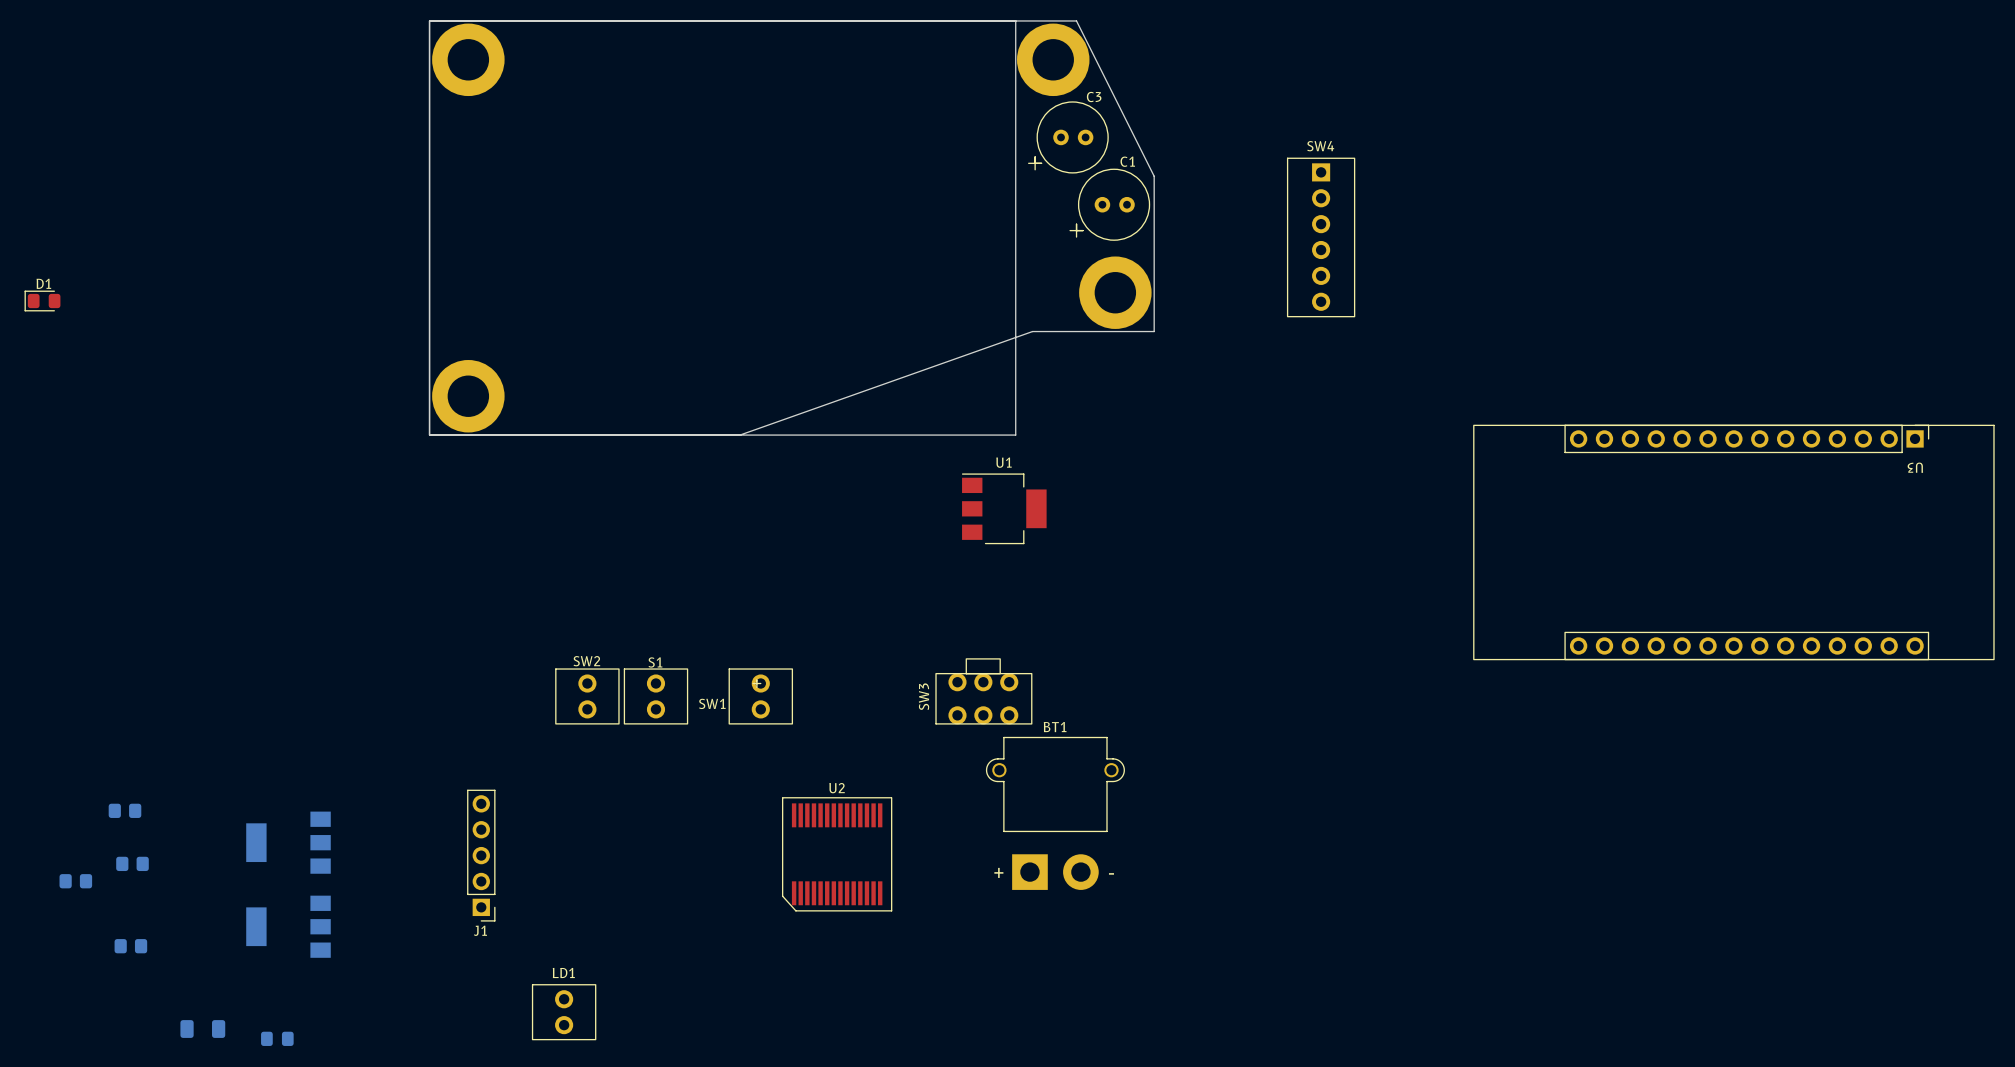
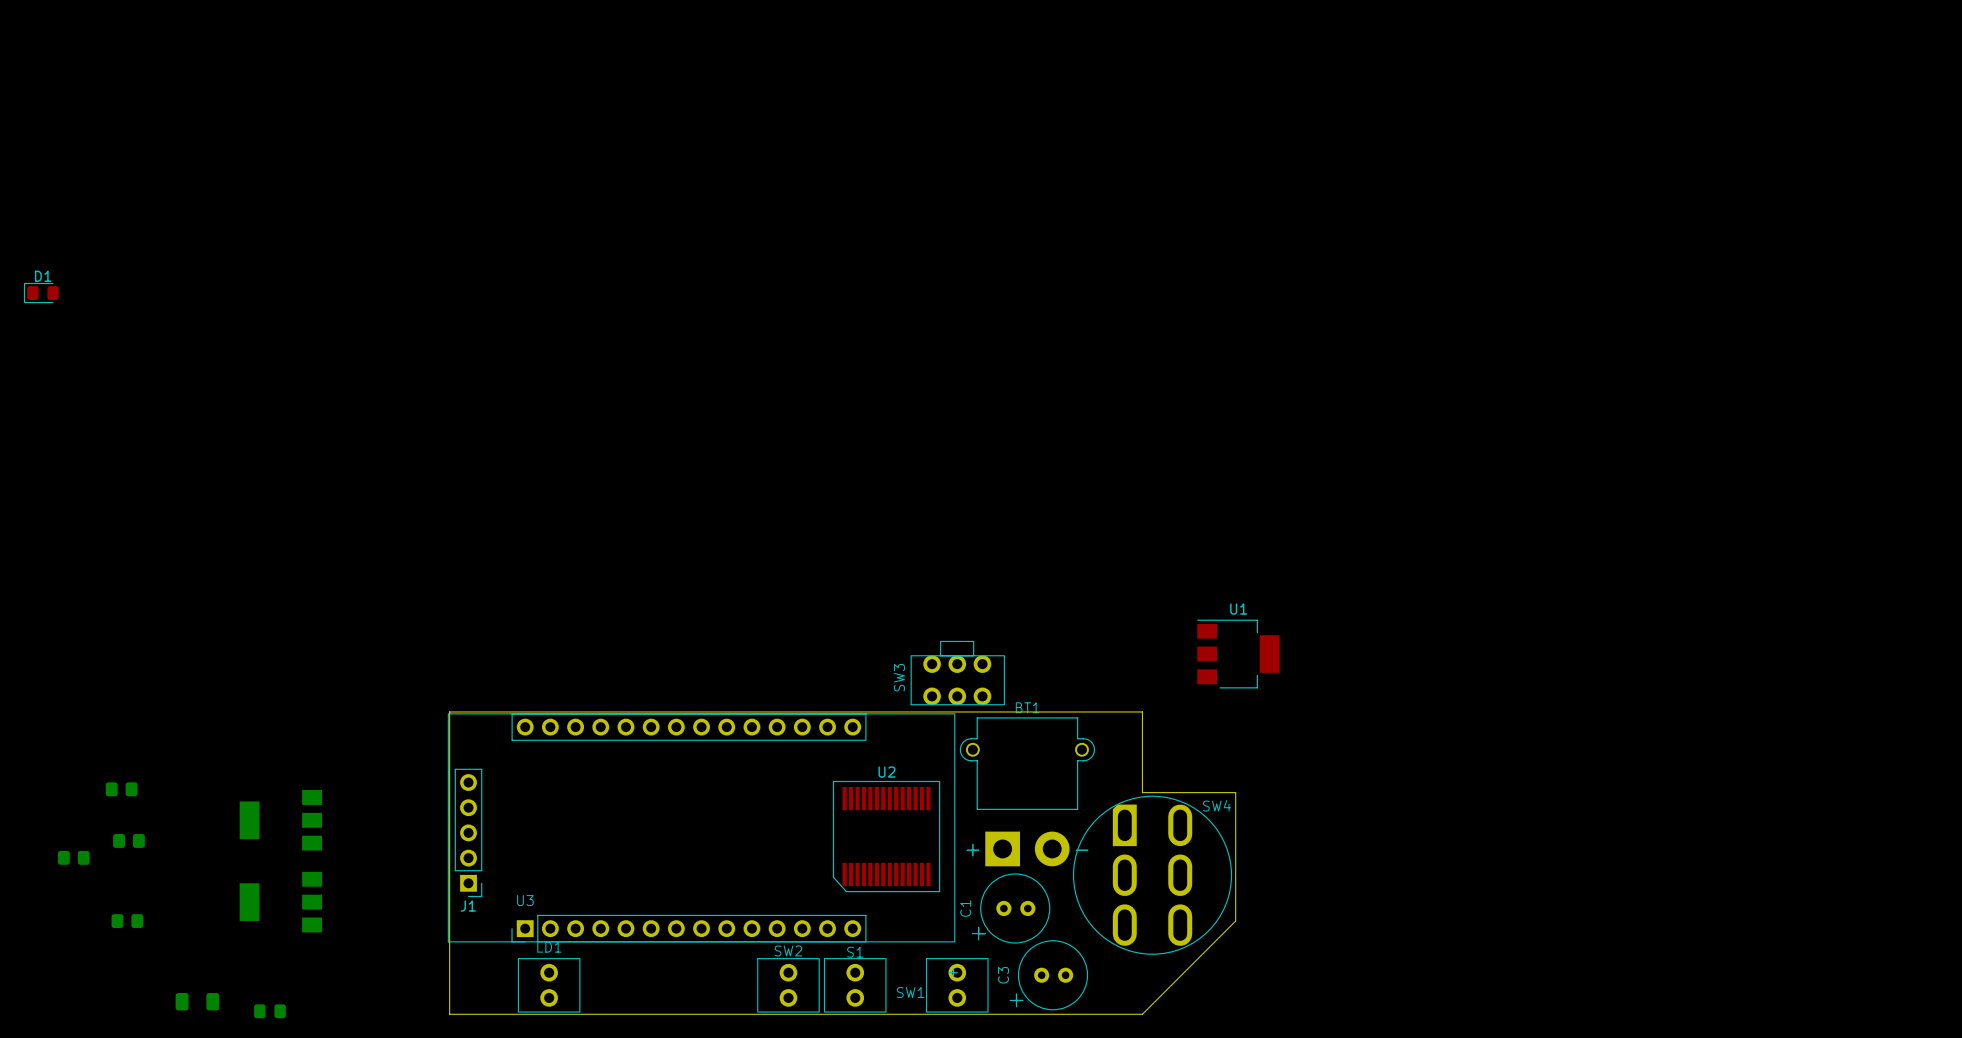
board edge: (1015, 20) (1015, 435) (429, 435) (429, 20) (1076, 20) (1154, 176) (1154, 331) (1032, 331) (740, 435) -> none
part: (468, 59) -> none
part: (1053, 59) -> none
C3 name rotation: 0° (1094, 97) -> 90° counterclockwise (1003, 975)
C3 name position: C3 (1094, 97) -> C3 (1003, 975)
C3 position: (1068, 137) -> (1048, 975)
SW4 name position: SW4 (1320, 146) -> SW4 (1217, 805)
SW4 footprint: [1287, 157, 1356, 318] -> [1073, 795, 1233, 955]
C1 name rotation: 0° (1127, 161) -> 90° counterclockwise (965, 908)
C1 name position: C1 (1127, 161) -> C1 (965, 908)
C1 position: (1109, 204) -> (1011, 908)
part: (1115, 292) -> none
part: (468, 396) -> none
U1 position: (1004, 508) -> (1238, 654)
U3 rotation: 0° (1733, 542) -> 180° (701, 827)
U3 position: (1733, 542) -> (701, 827)
line: (756, 679) (756, 687) -> none
line: (753, 683) (760, 683) -> none
SW2 position: (587, 696) -> (788, 985)
S1 position: (655, 696) -> (855, 985)
SW1 position: (760, 696) -> (957, 985)
board edge: none -> (449, 711) (449, 1014) (1142, 1014) (1235, 921) (1235, 792) (1142, 792) (1142, 711) (449, 711)
U2 position: (837, 854) -> (886, 836)
line: none -> (953, 968) (953, 976)
line: none -> (949, 972) (957, 972)

